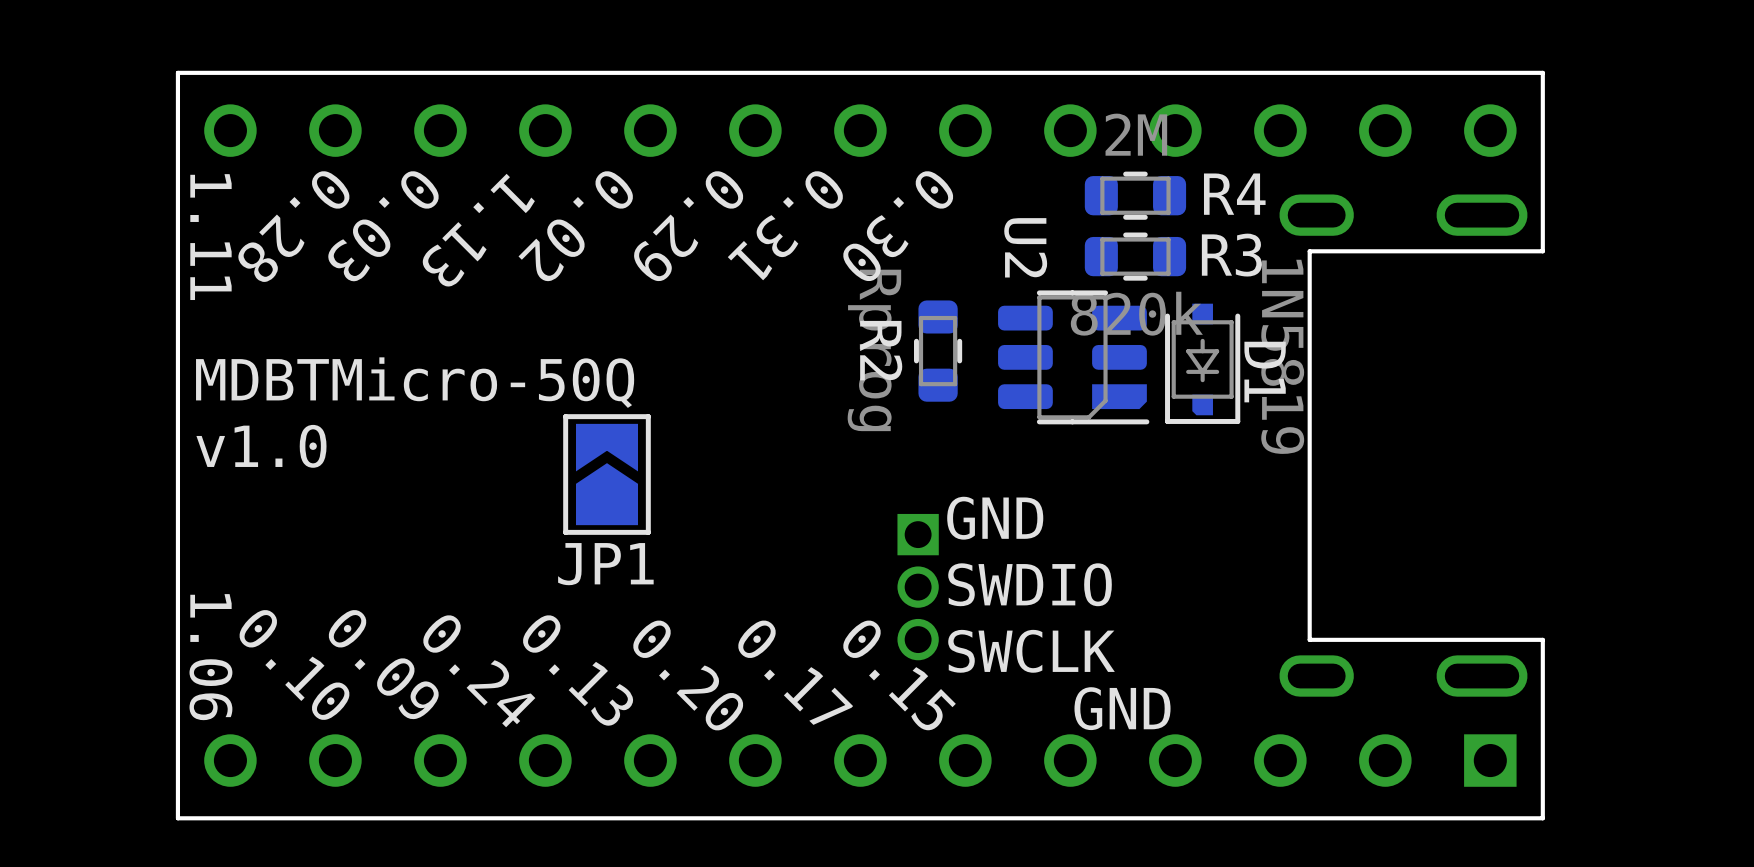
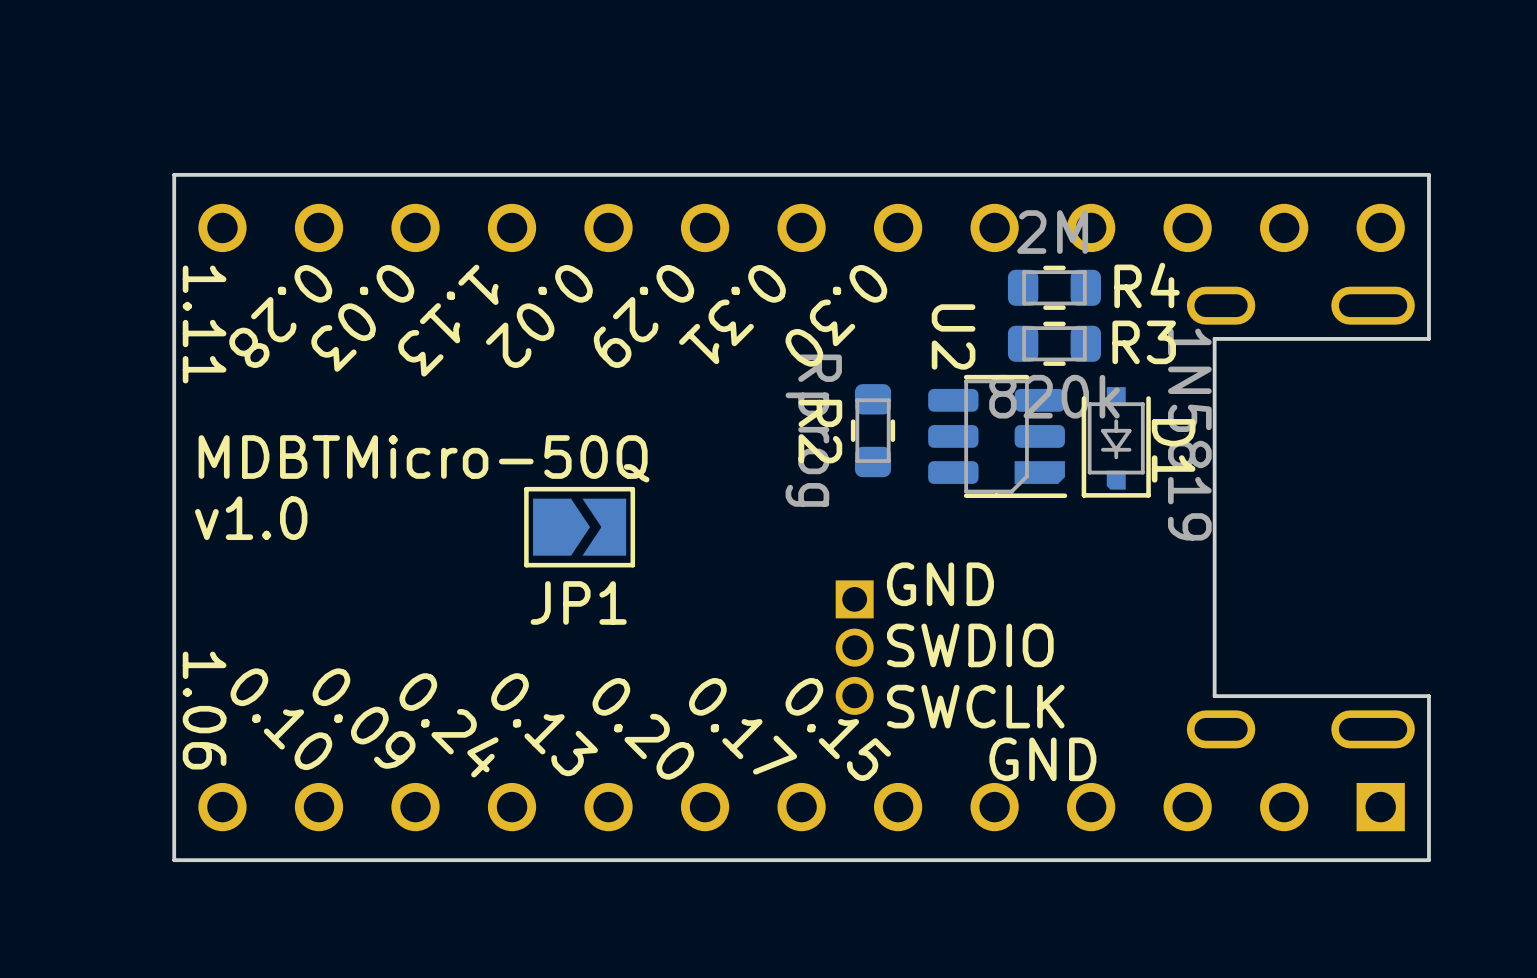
JP1 rotation: 0° (607, 474) -> 90° clockwise (579, 527)

